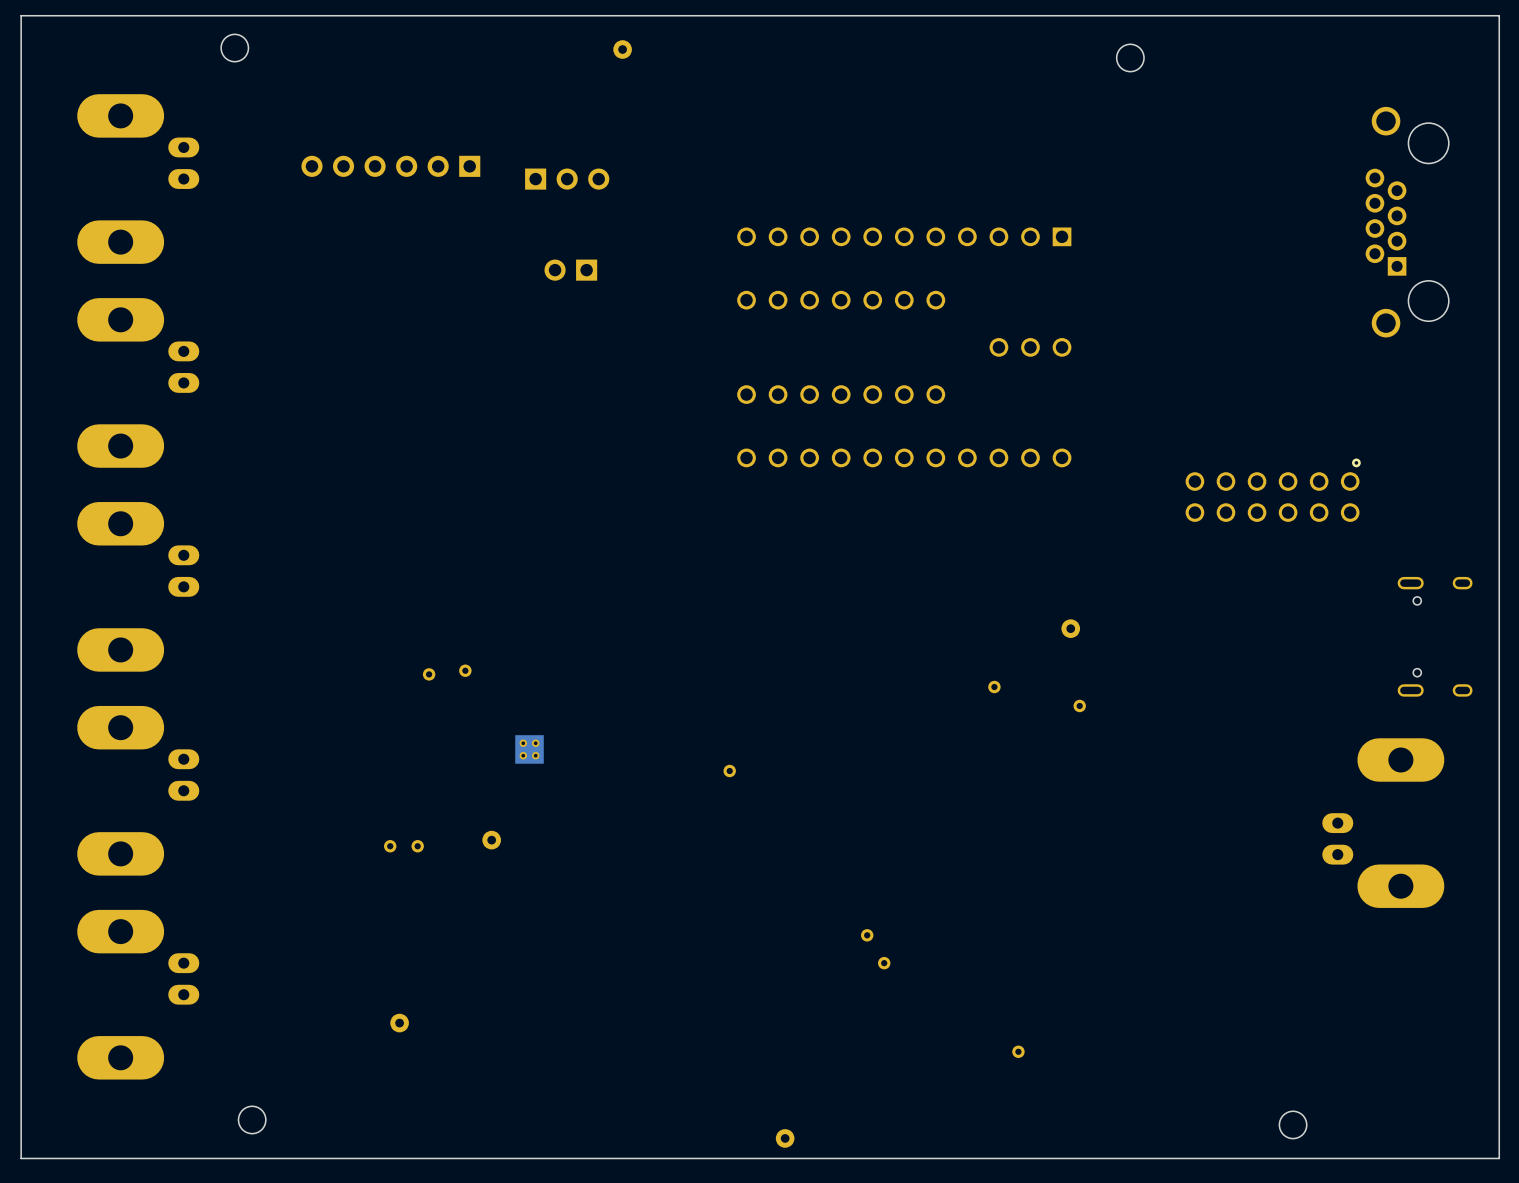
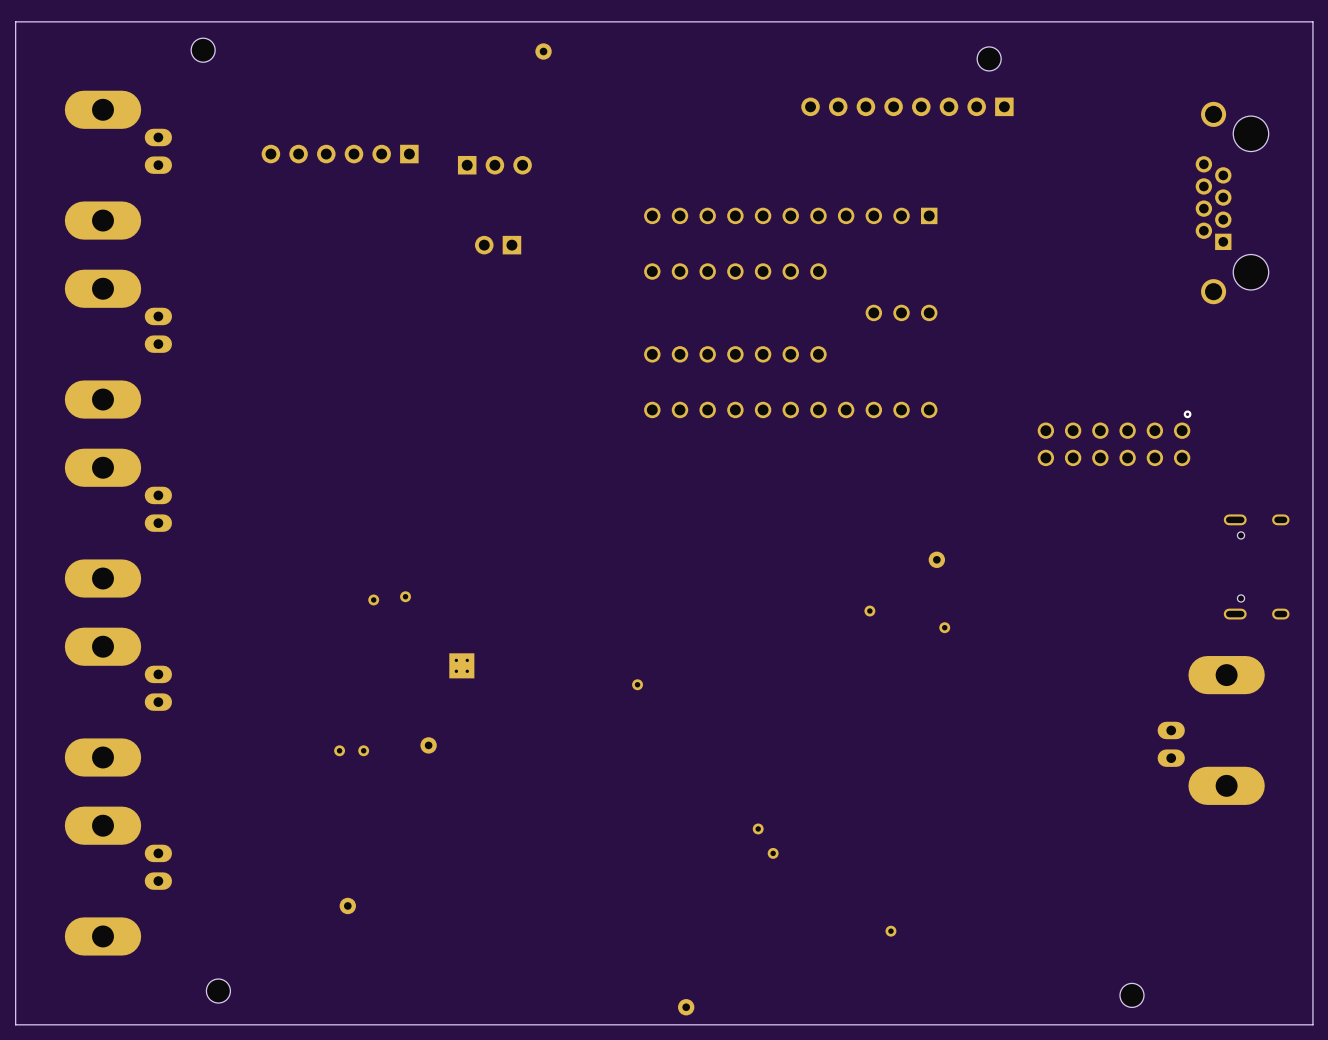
part: none -> (907, 106)

